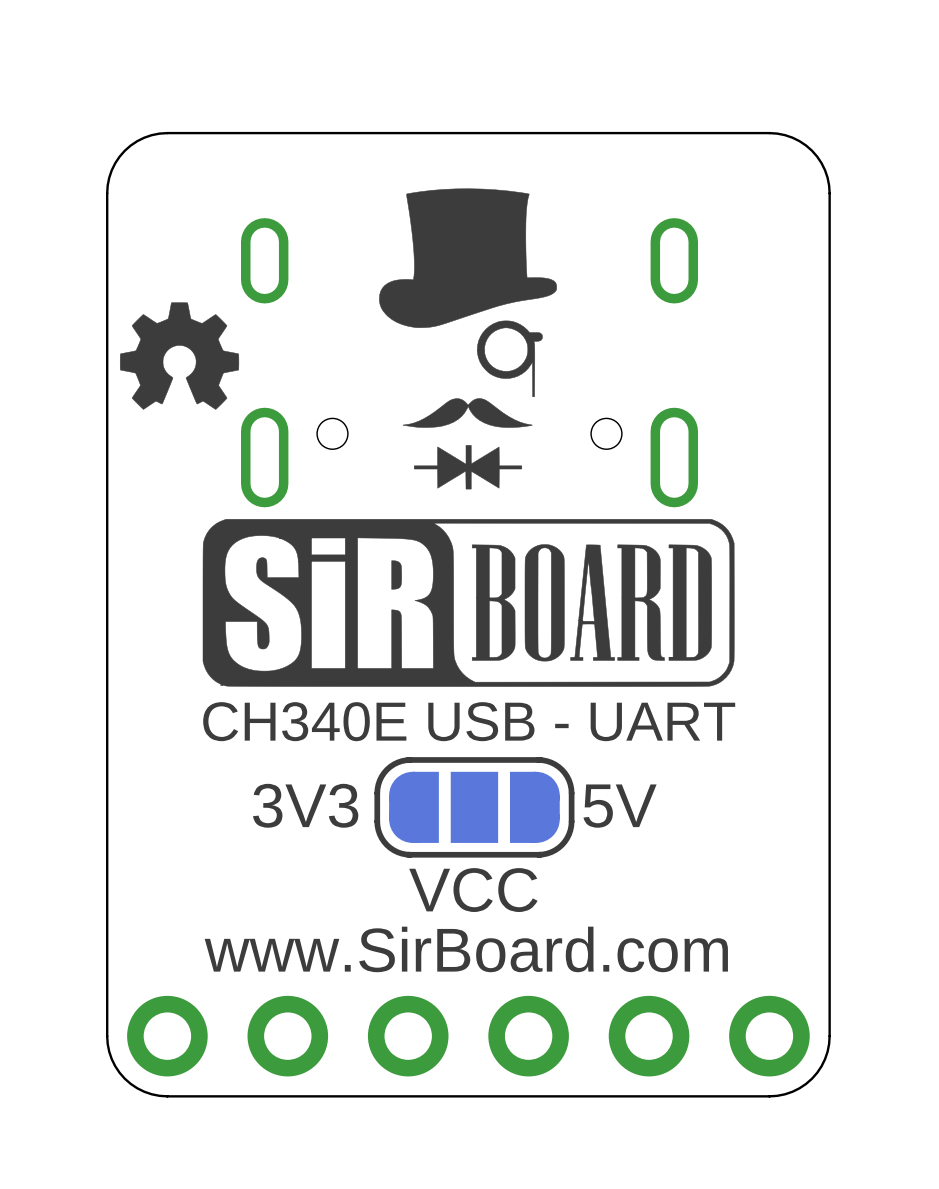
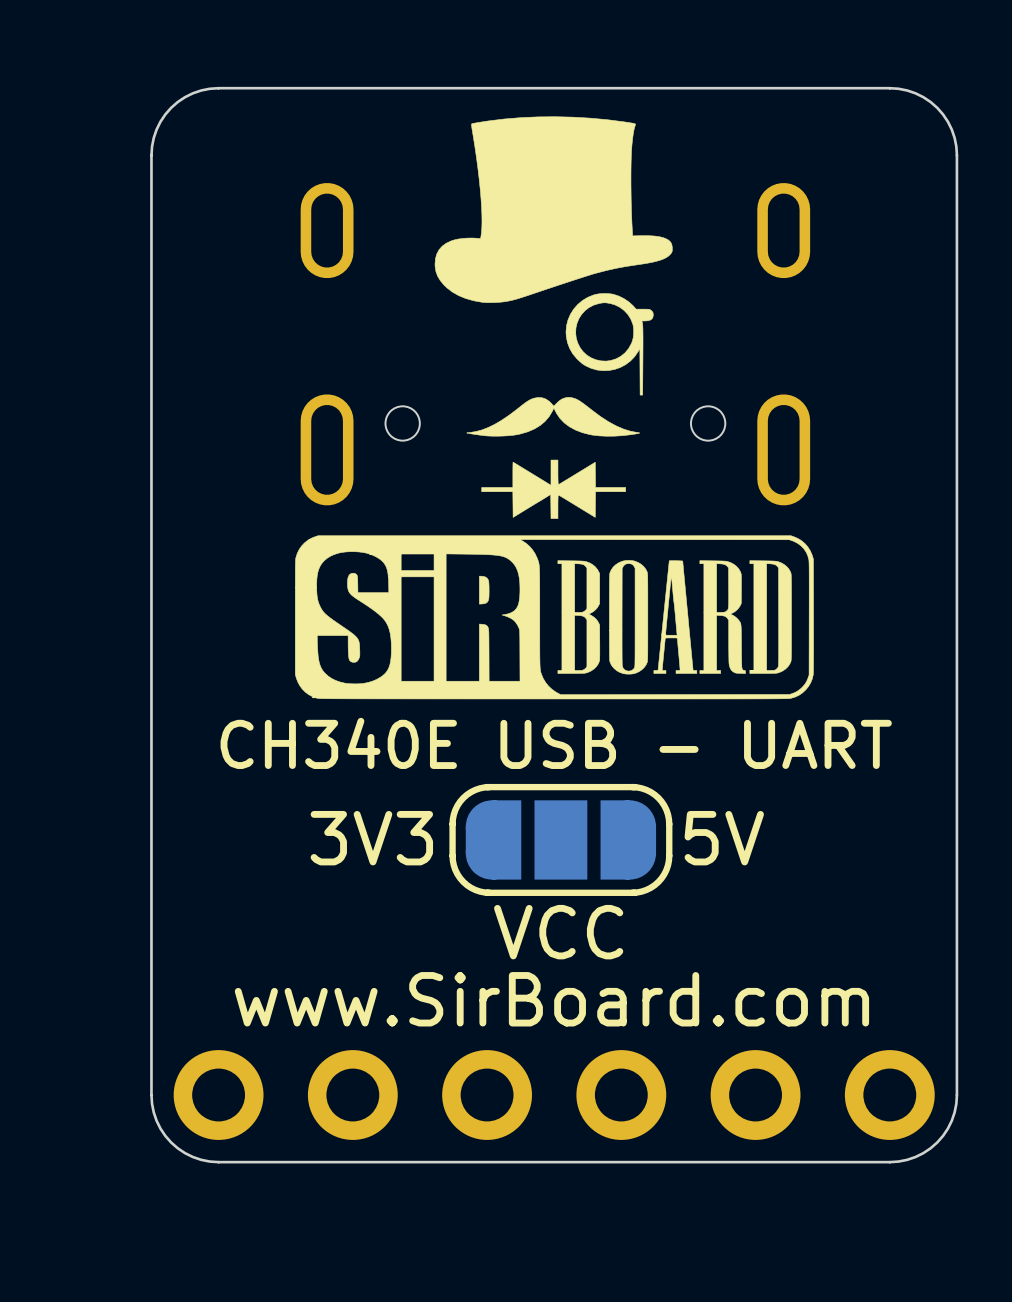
drawing shape: [379, 188, 557, 490] -> [434, 116, 673, 519]
drawing: [119, 302, 240, 410] -> none
drawing shape: [202, 519, 735, 687] -> [295, 535, 814, 700]

